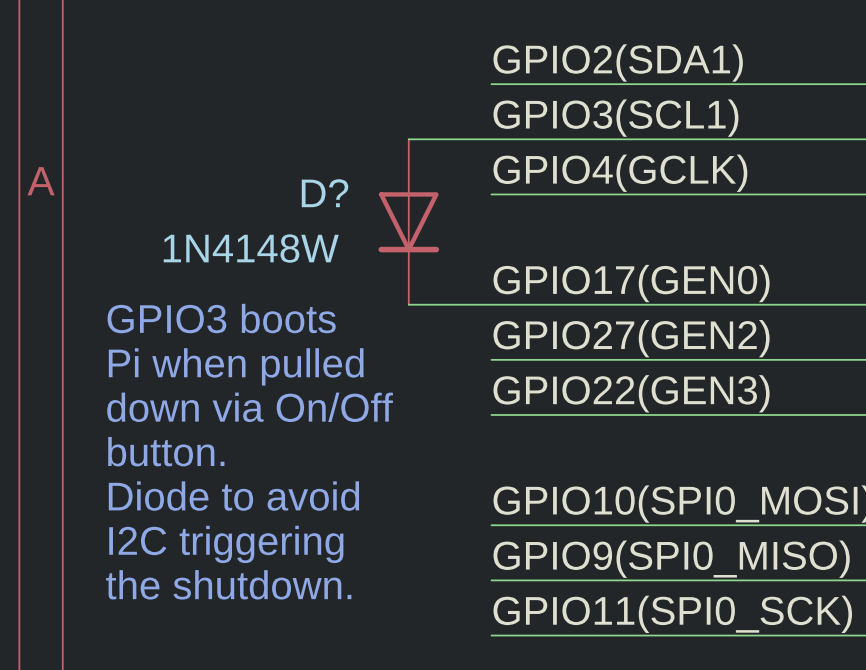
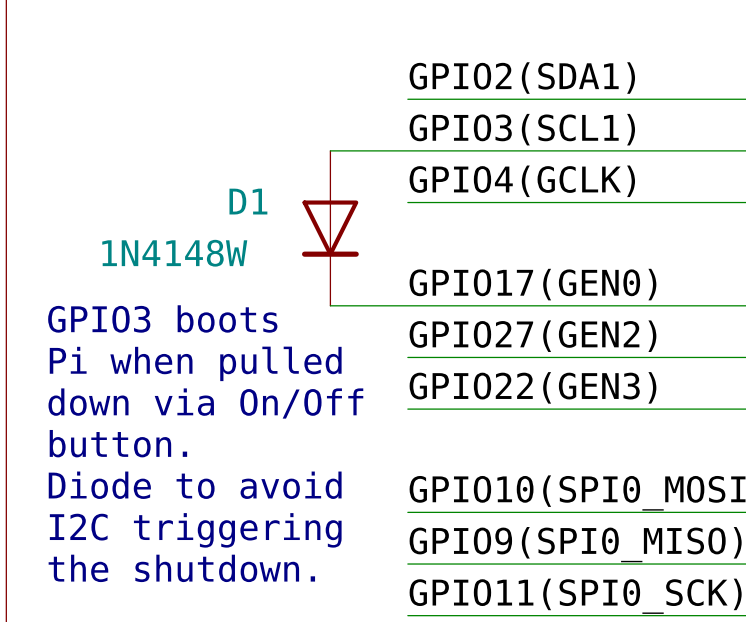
D? name: D? (325, 193) -> D1 (248, 201)

